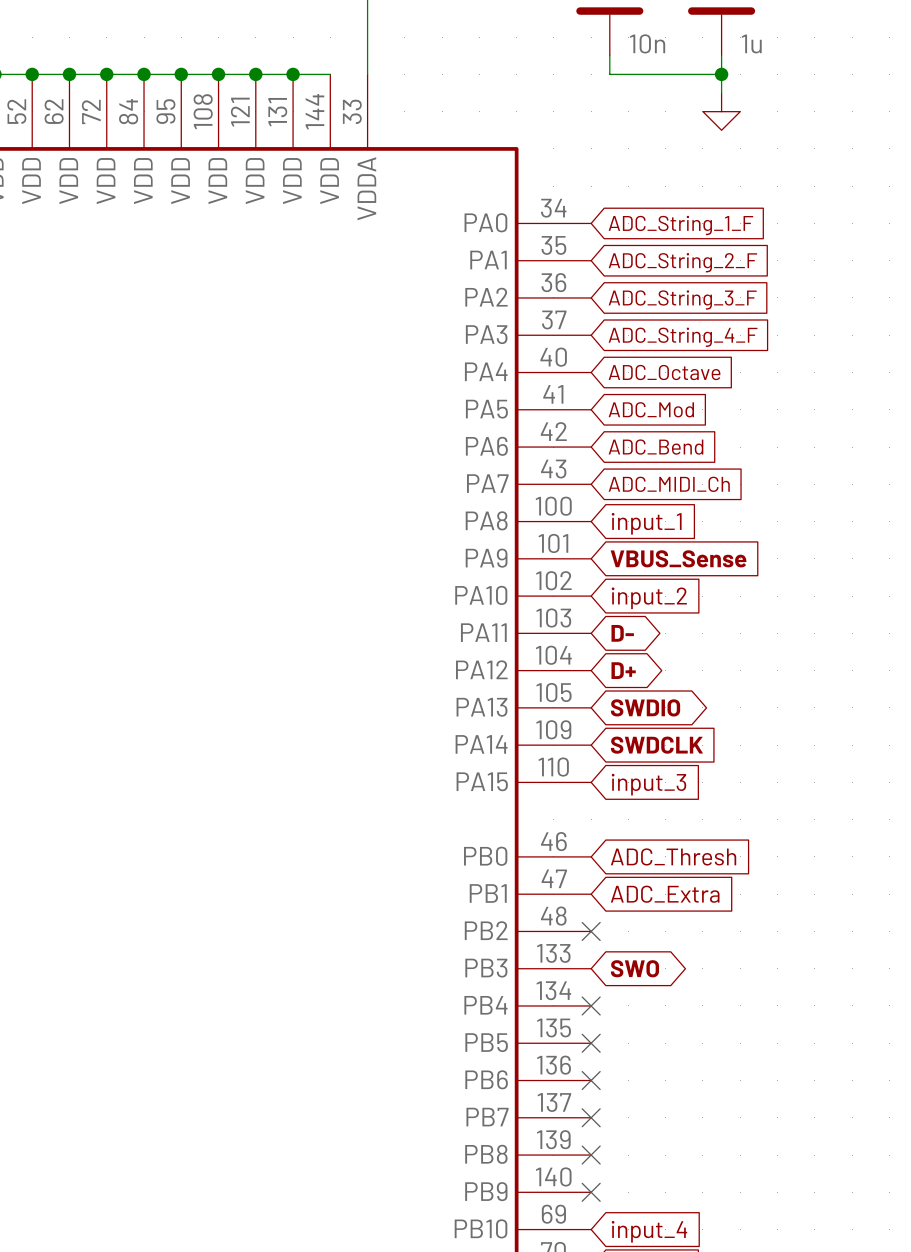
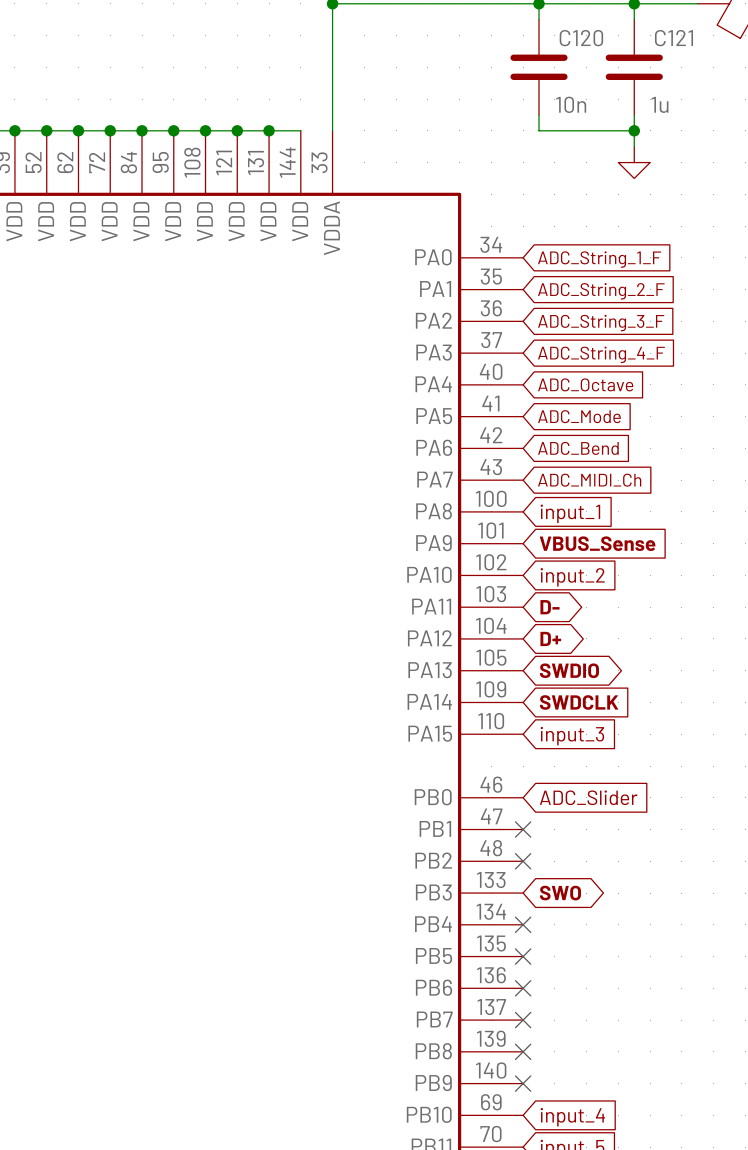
global label: ADC_Mod (651, 409) -> ADC_Mode (579, 416)
global label: ADC_Thresh (673, 856) -> ADC_Slider (588, 797)
no-connect mark: none -> (523, 829)
global label: ADC_Extra (665, 894) -> none

